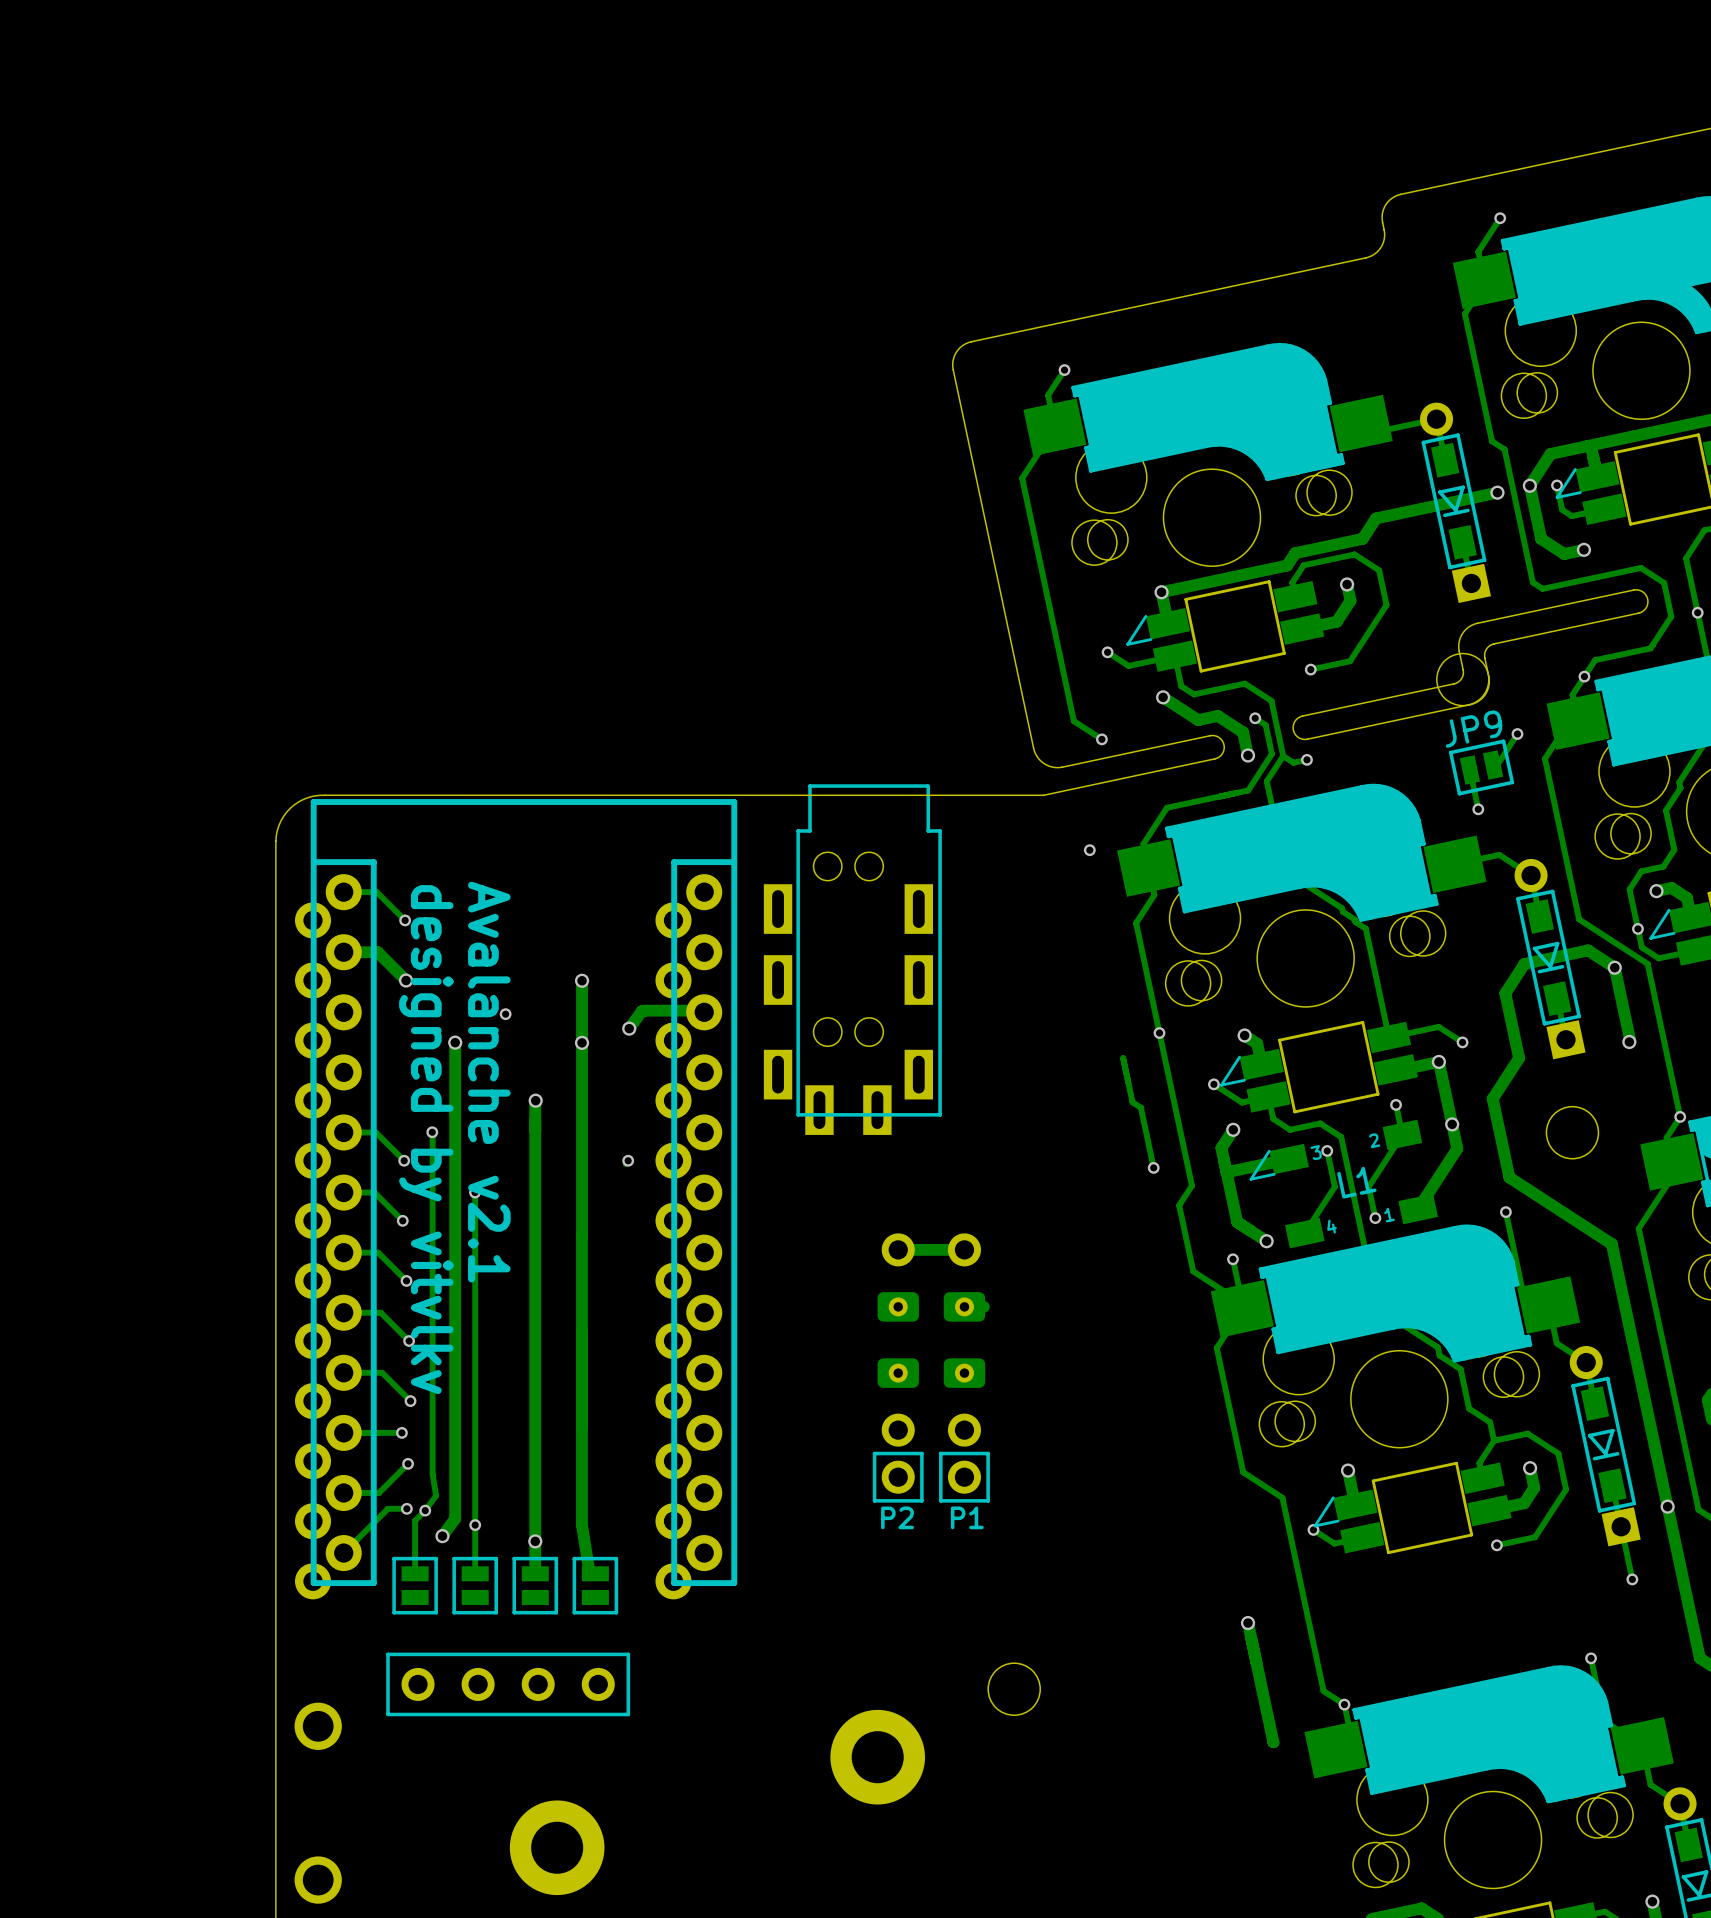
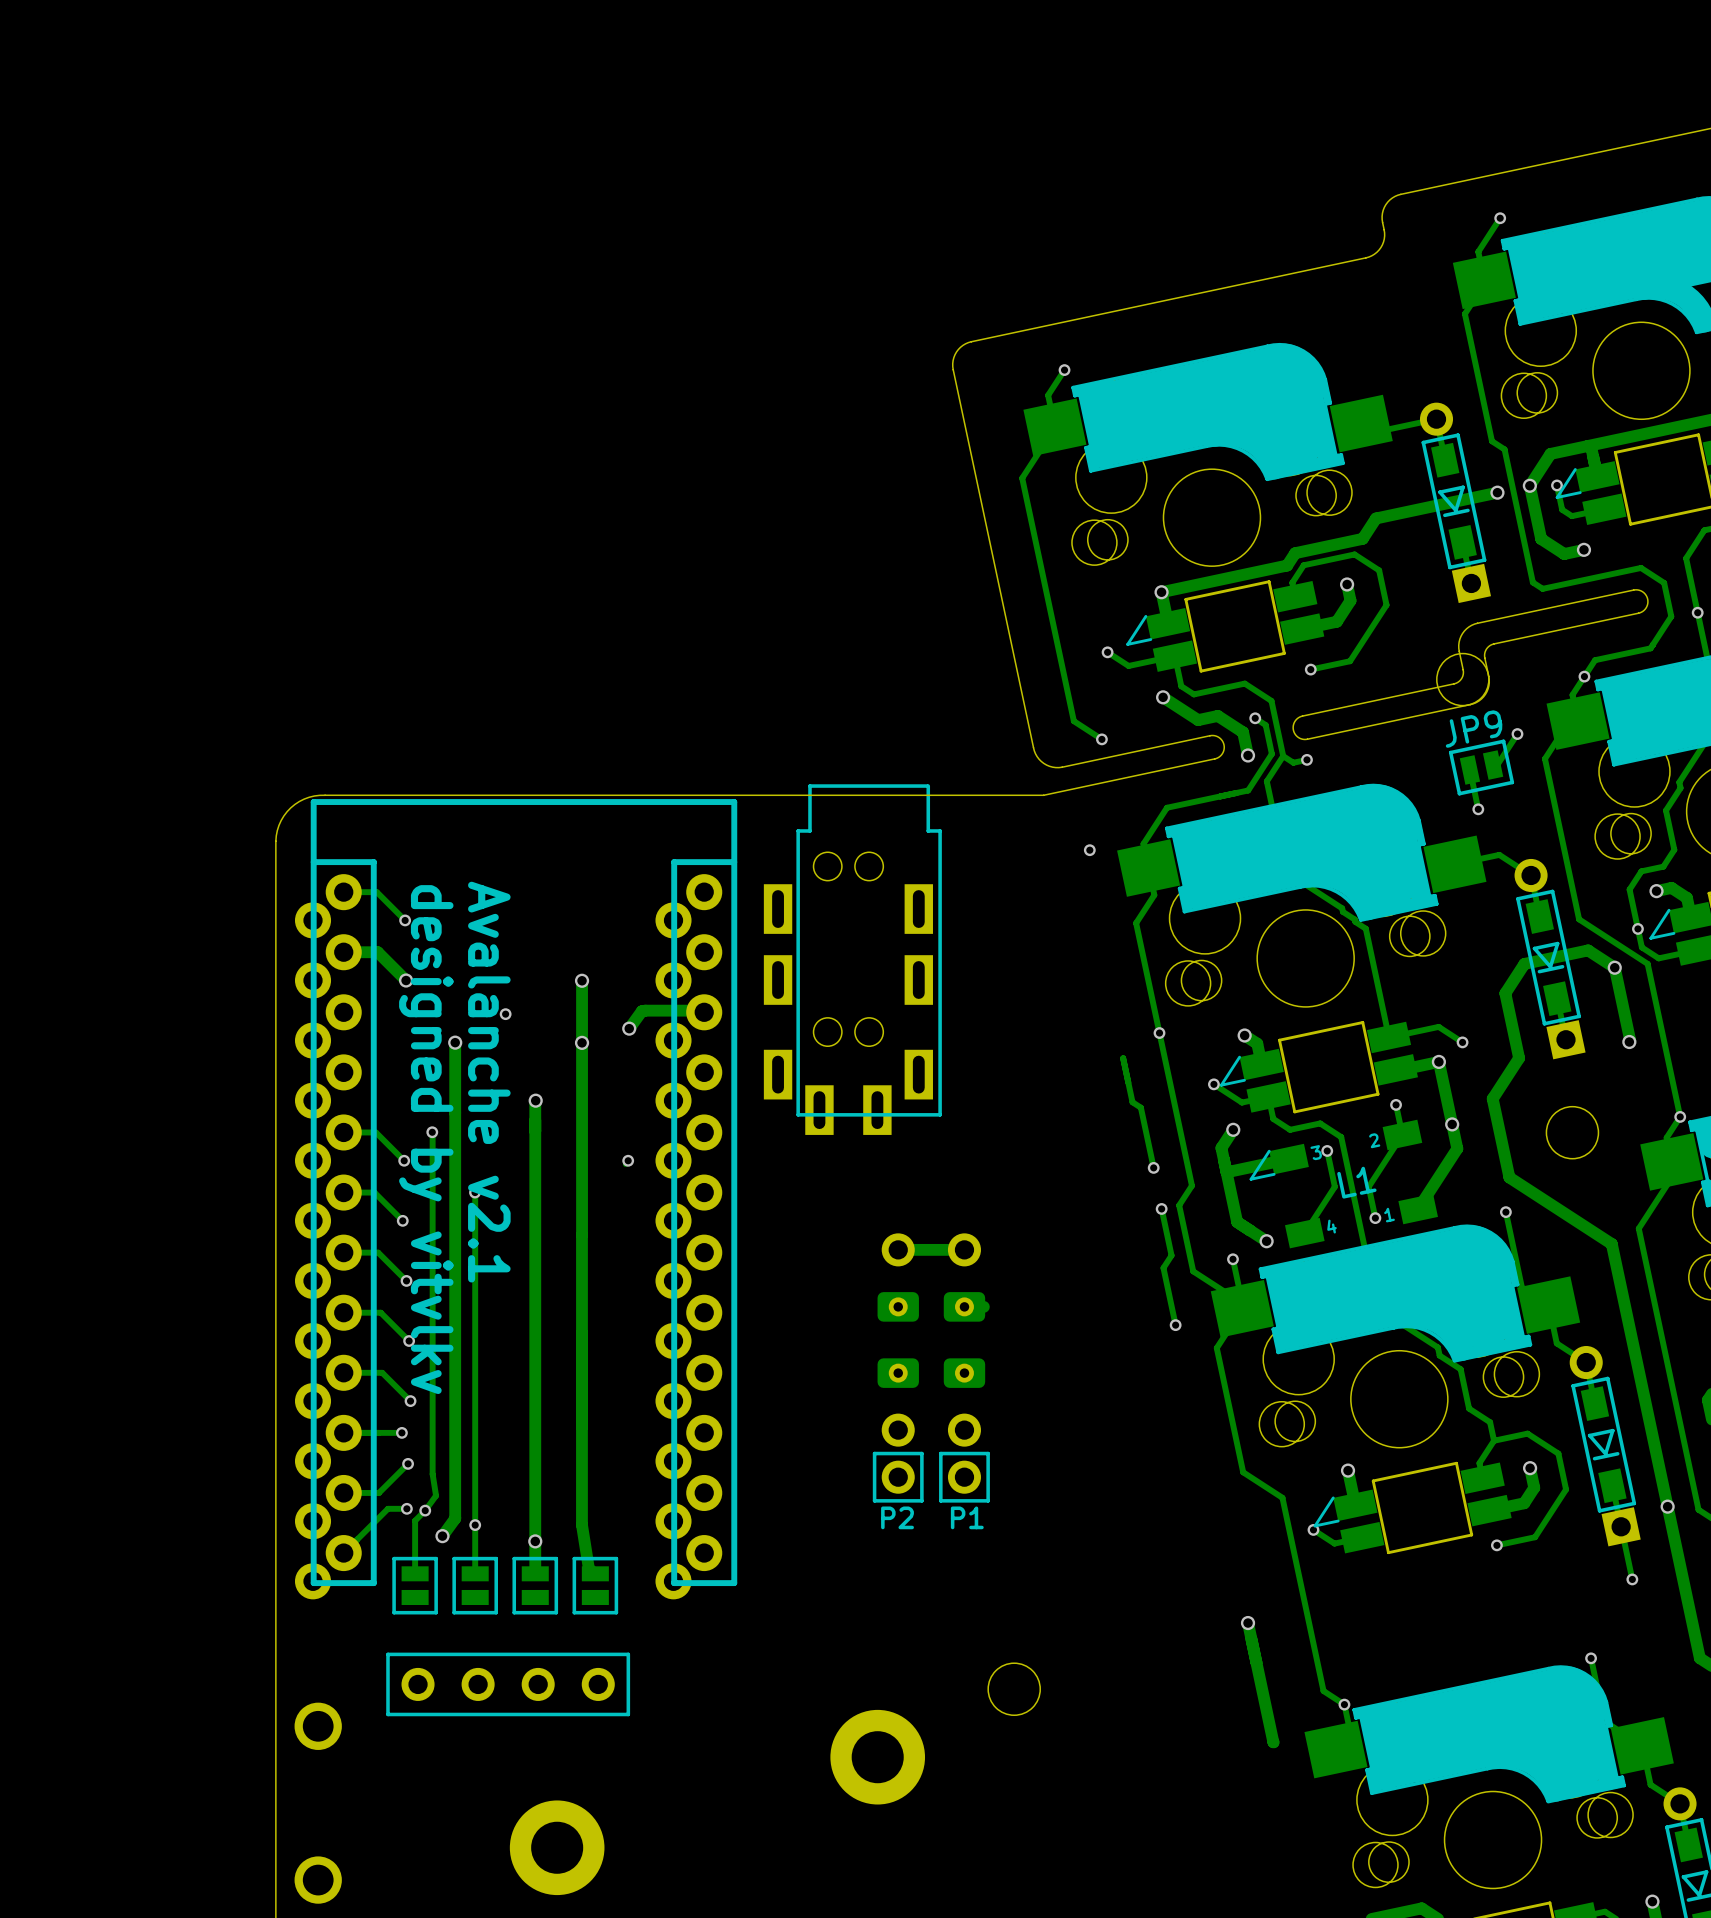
track: none -> (1161, 1208) (1171, 1255) (1163, 1267) (1175, 1325)
via: none -> (1161, 1208)
via: none -> (1175, 1325)

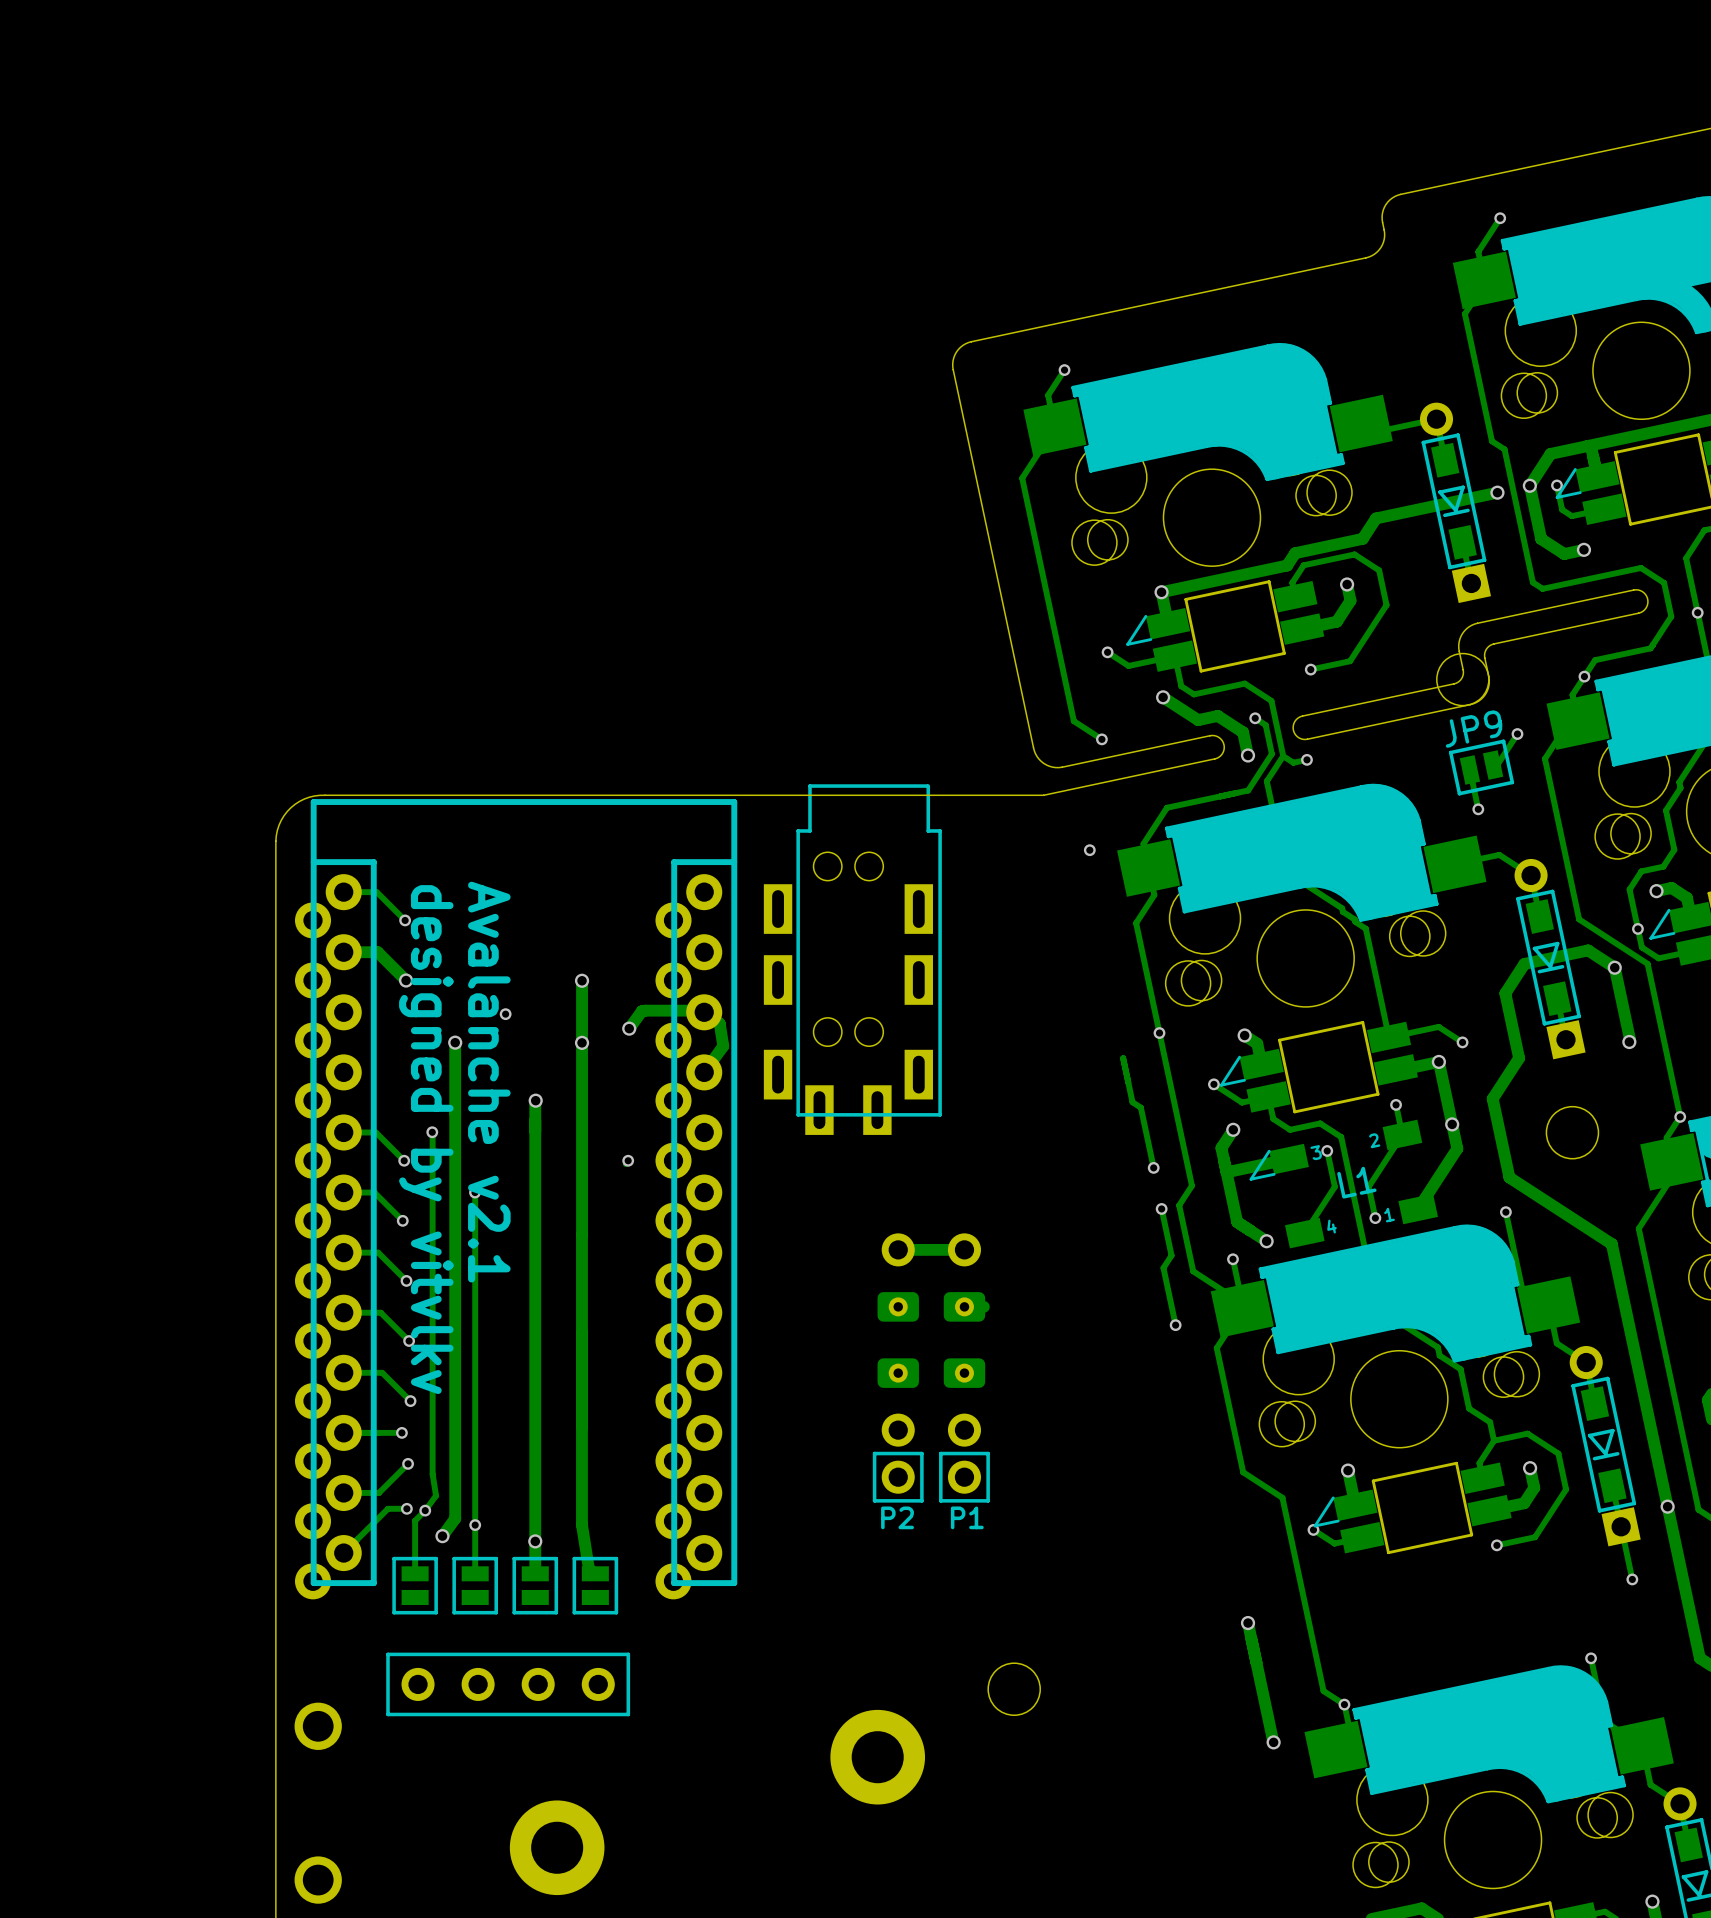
track: none -> (704, 1012) (719, 1023) (723, 1046) (704, 1072)
via: none -> (1273, 1742)

